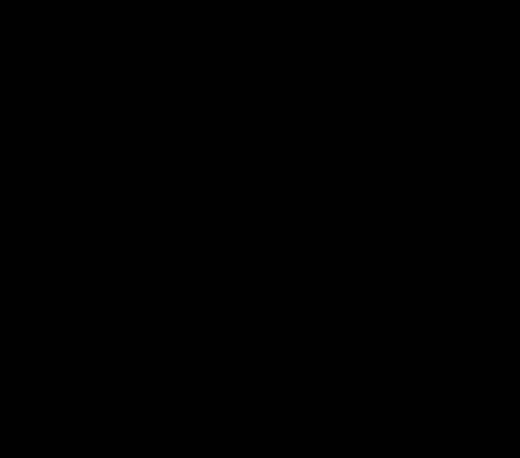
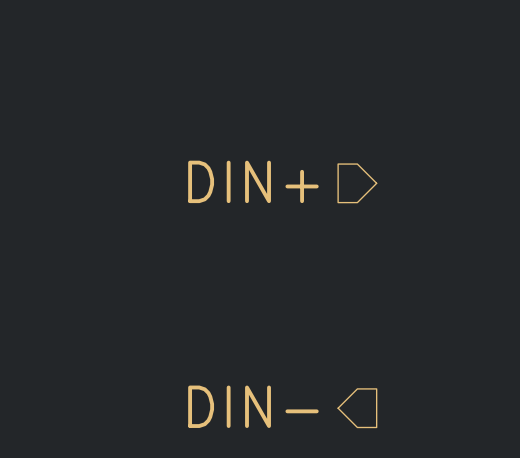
hierarchical label: none -> DIN+ (253, 181)
hierarchical label: none -> DIN- (253, 406)

